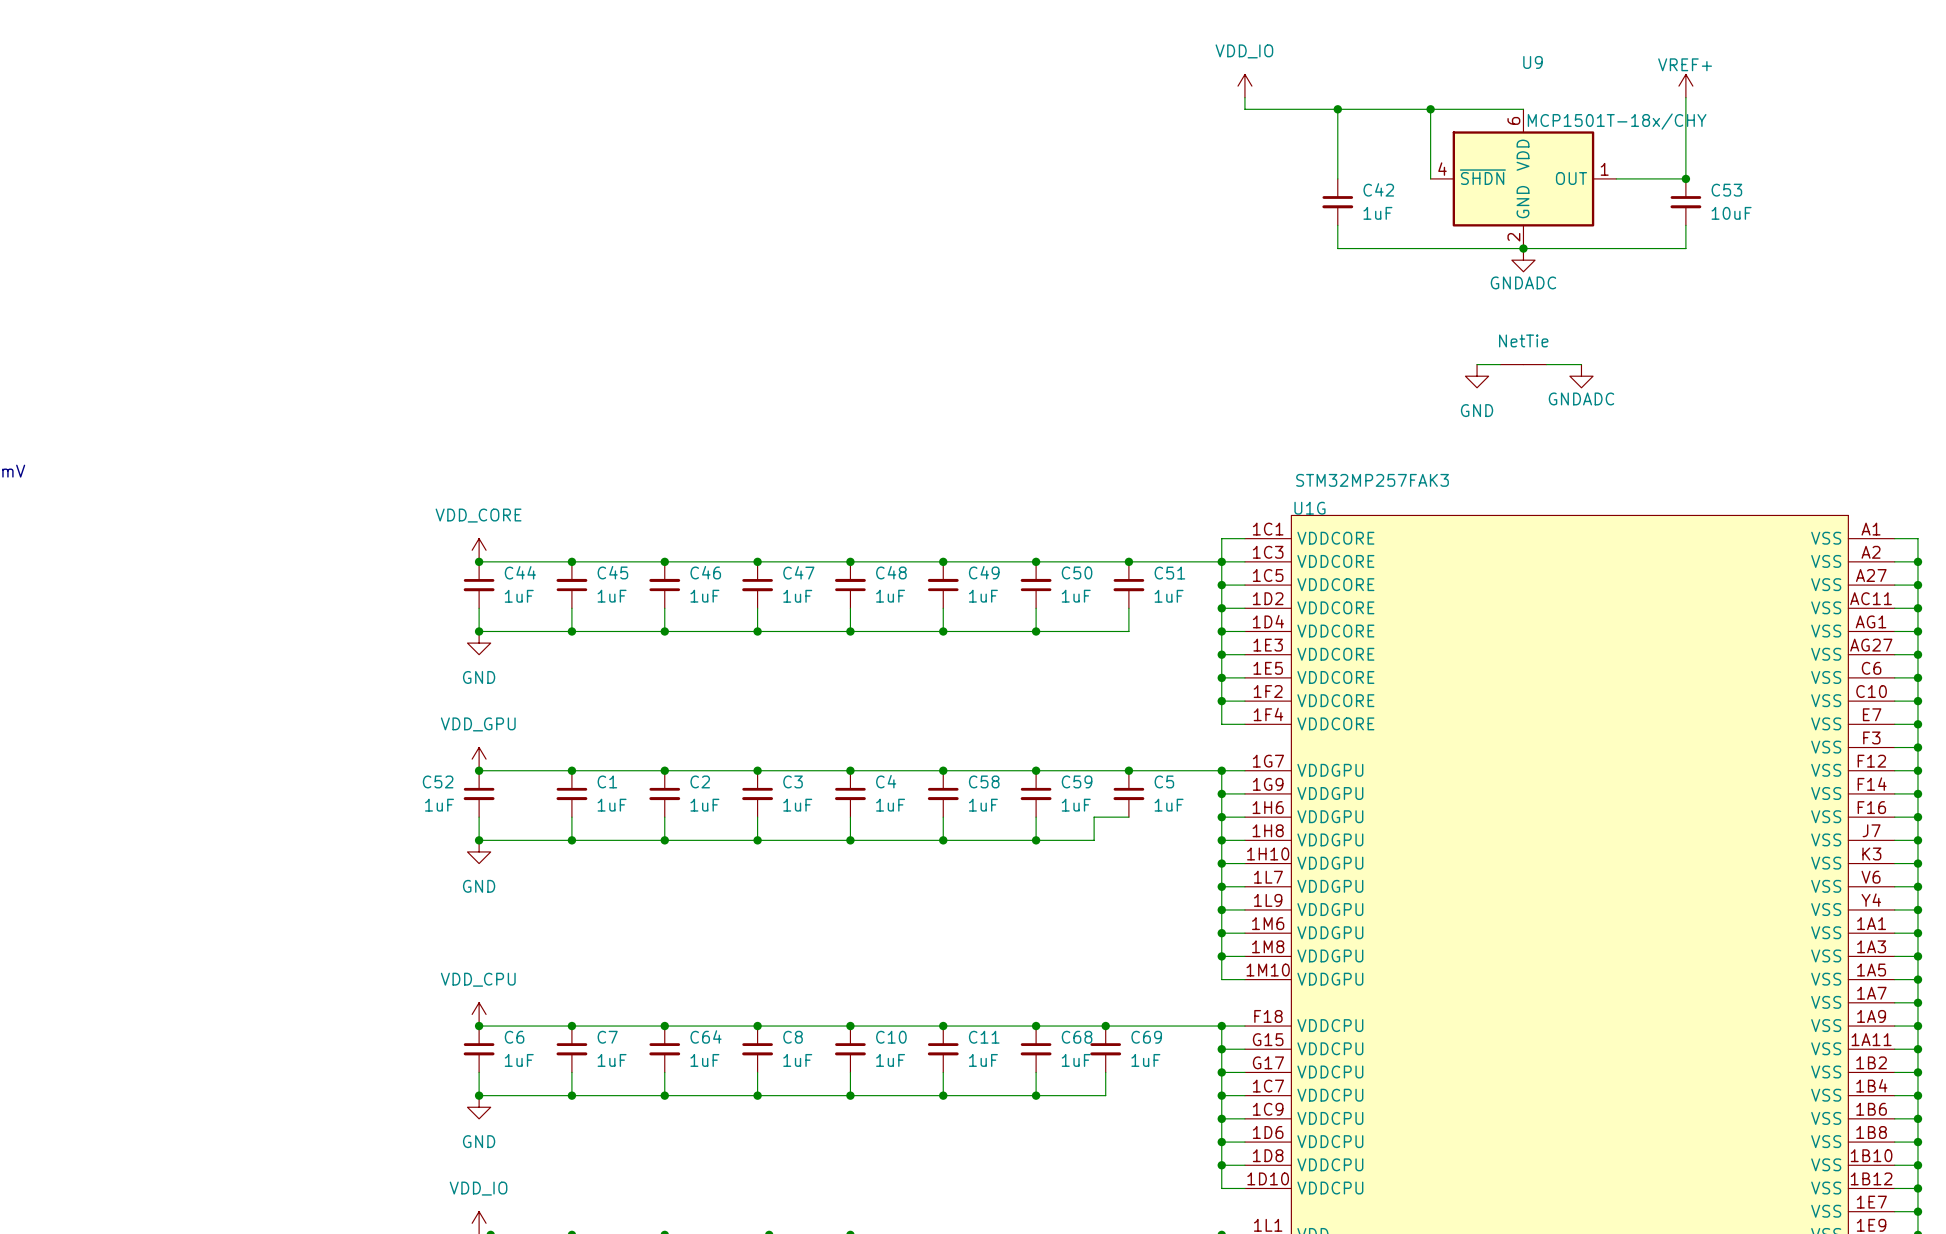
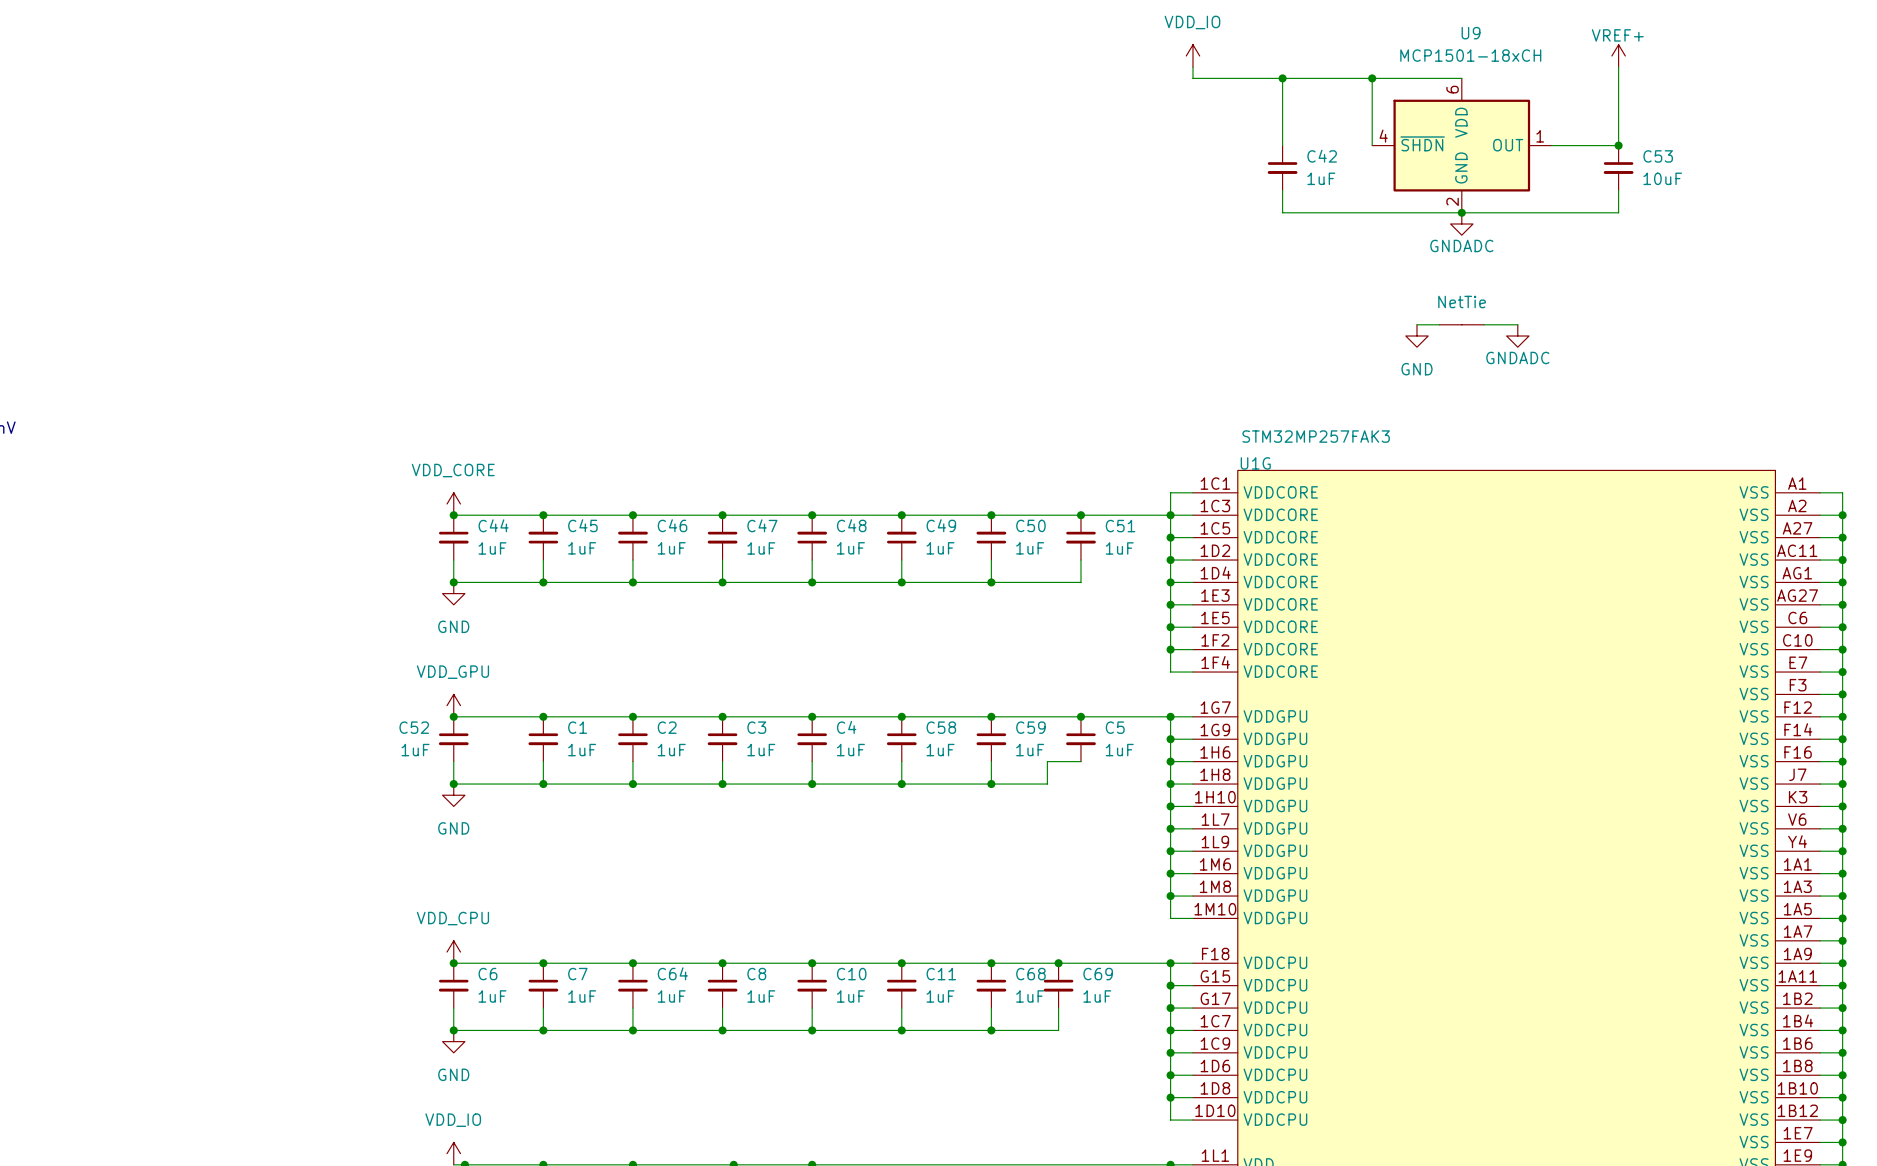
U9 value: MCP1501T-18x/CHY (1617, 121) -> MCP1501-18xCH (1470, 55)

